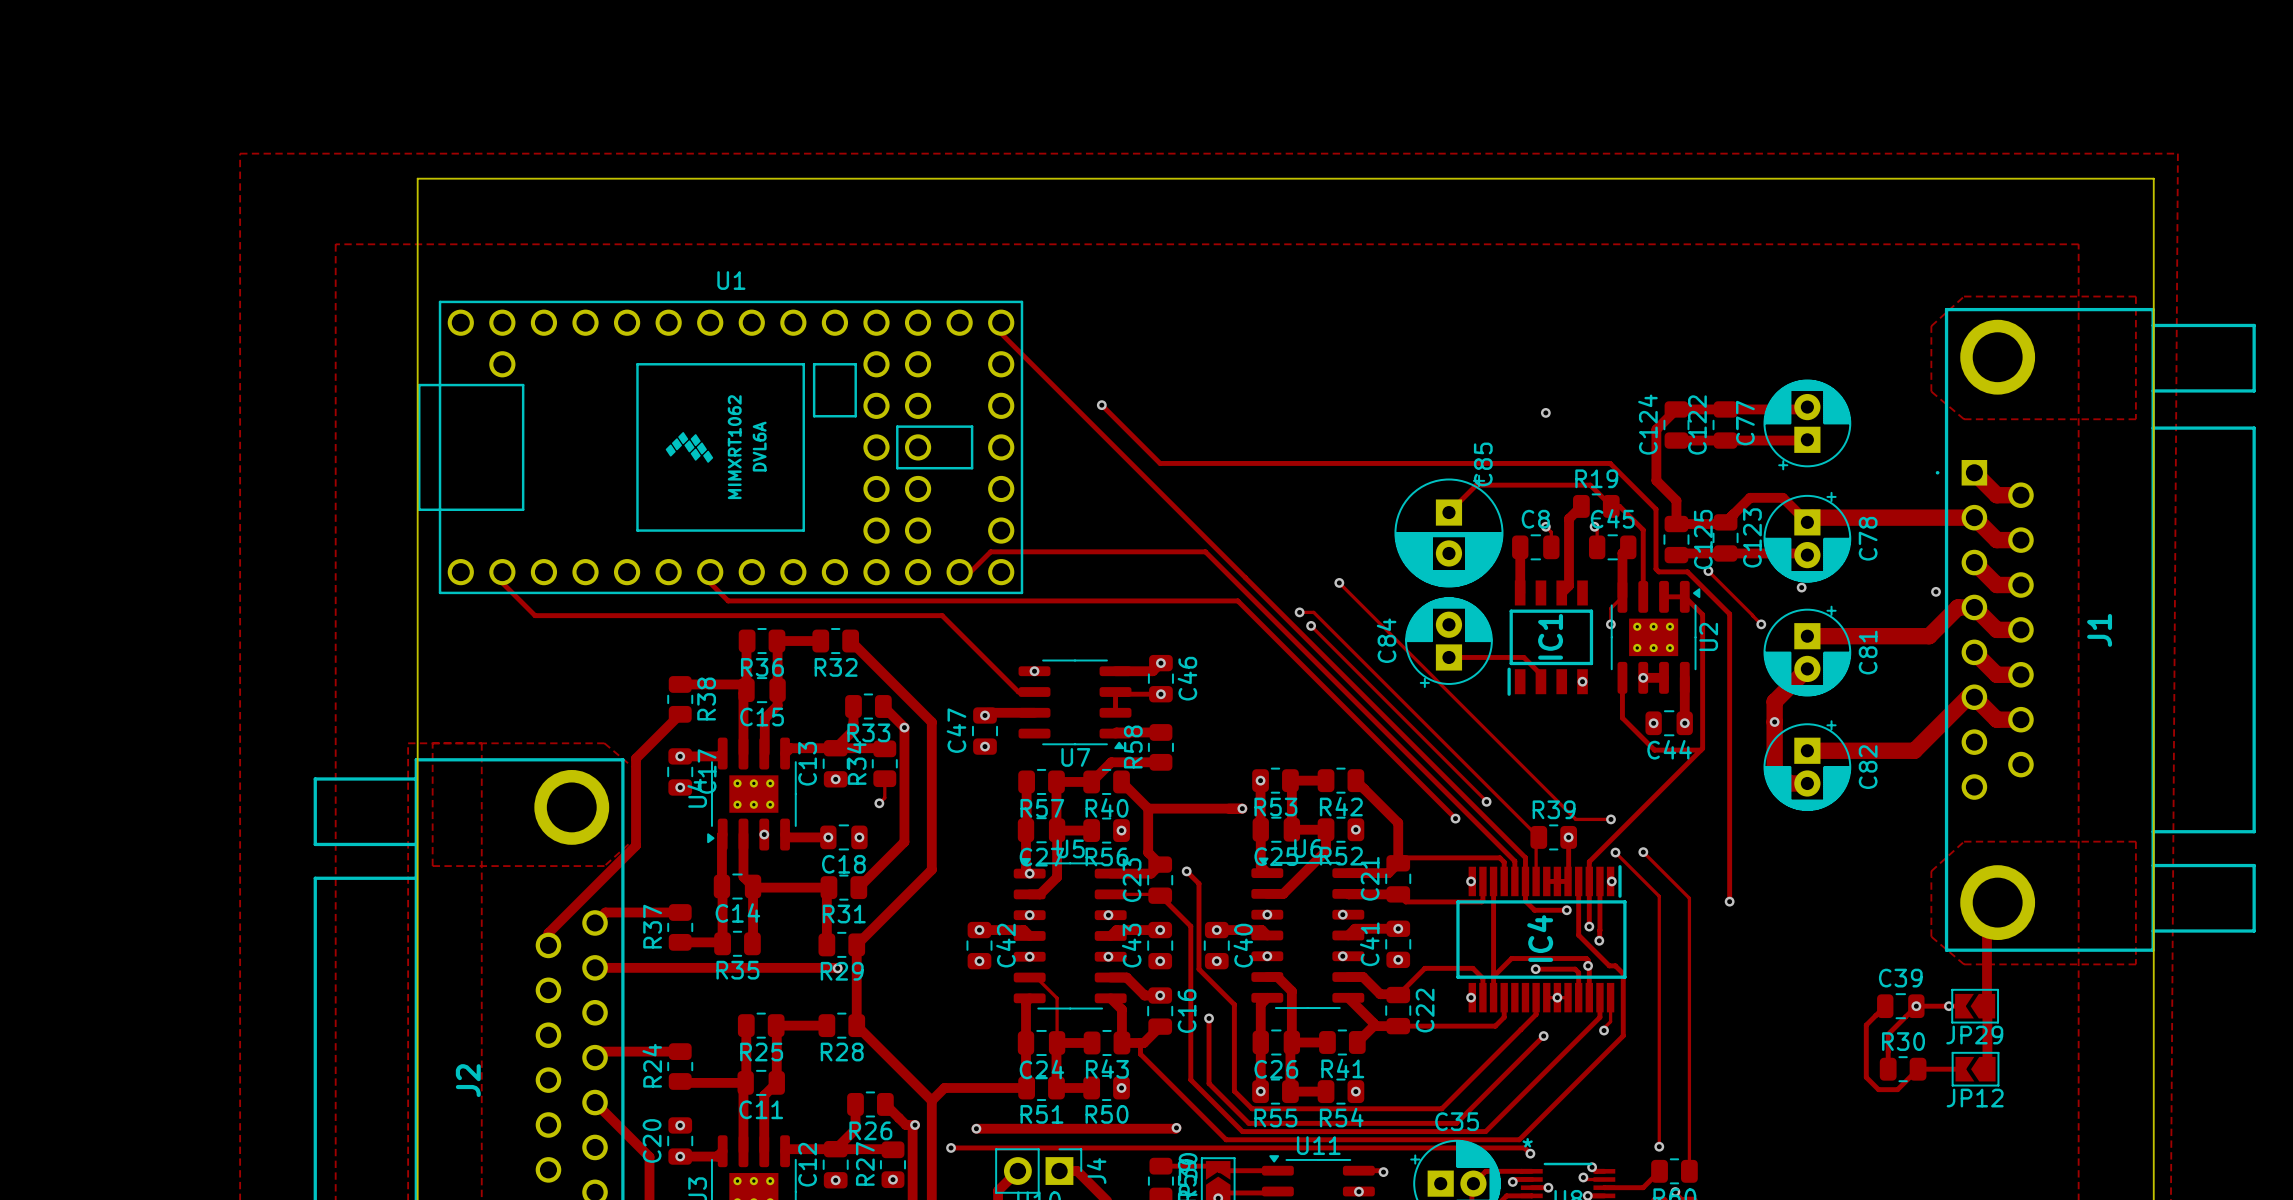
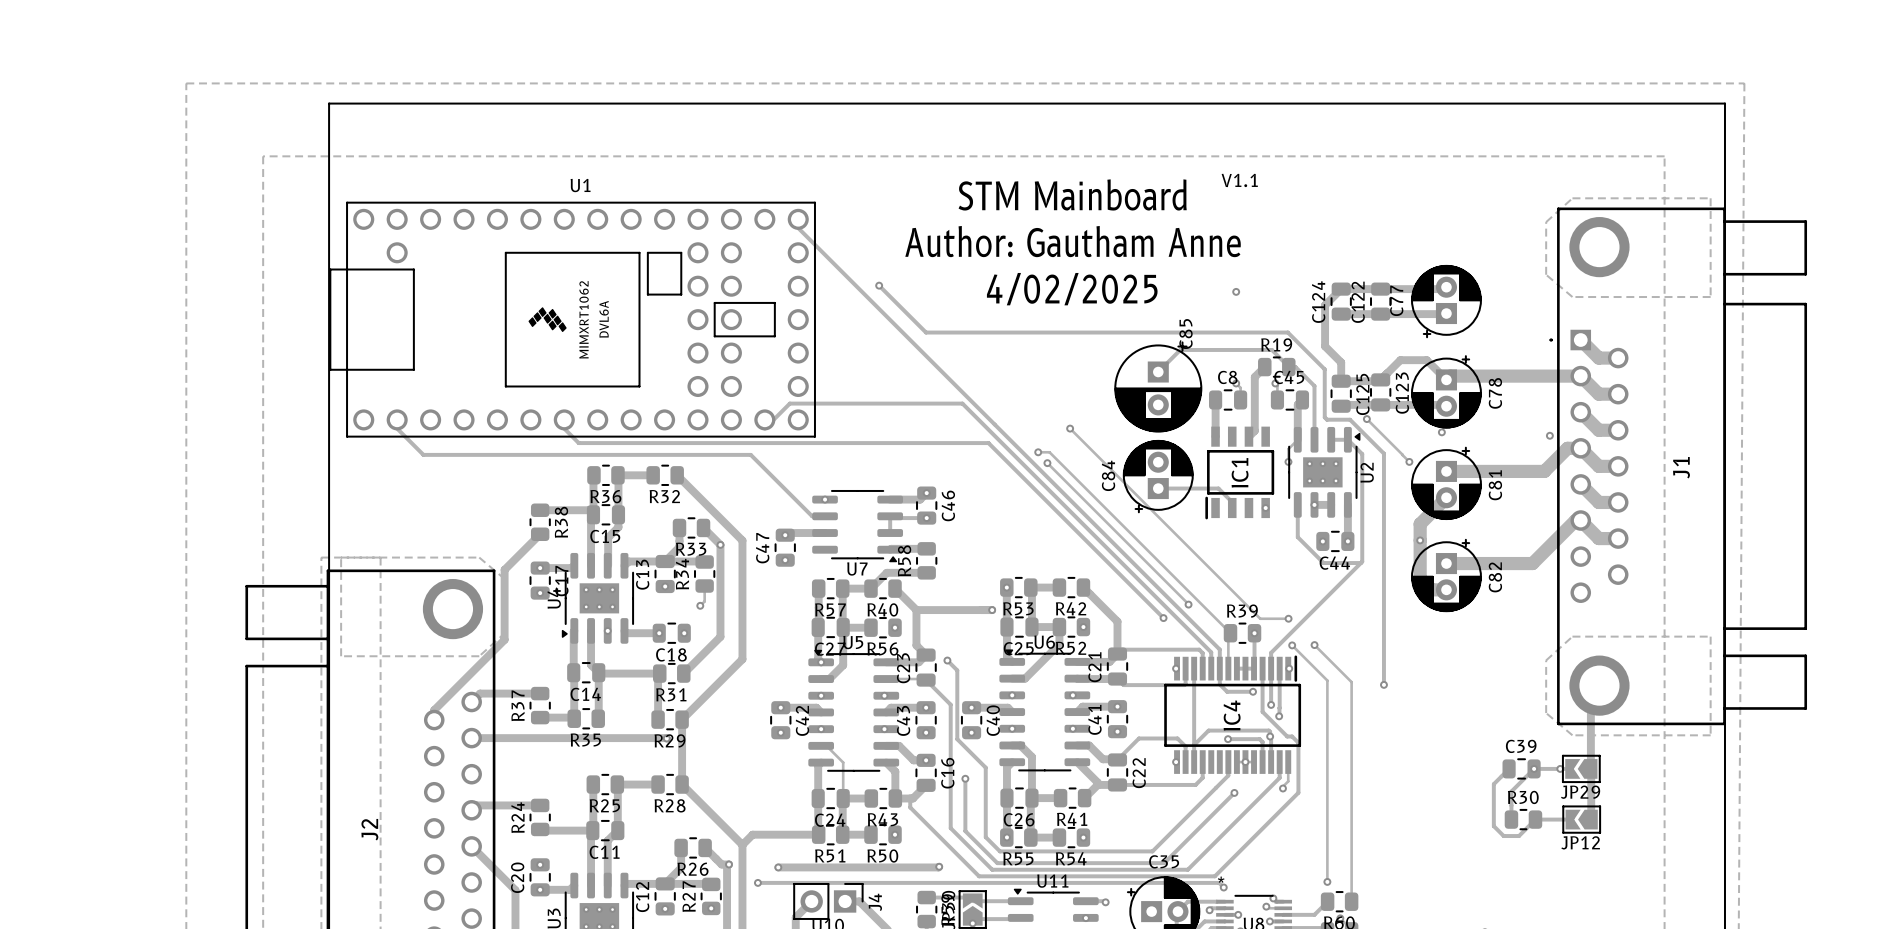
text: none -> V1.1 (1239, 180)
text: none -> STM Mainboard (1072, 194)
text: none -> Author: Gautham Anne (1073, 241)
text: none -> 4/02/2025 (1072, 289)

